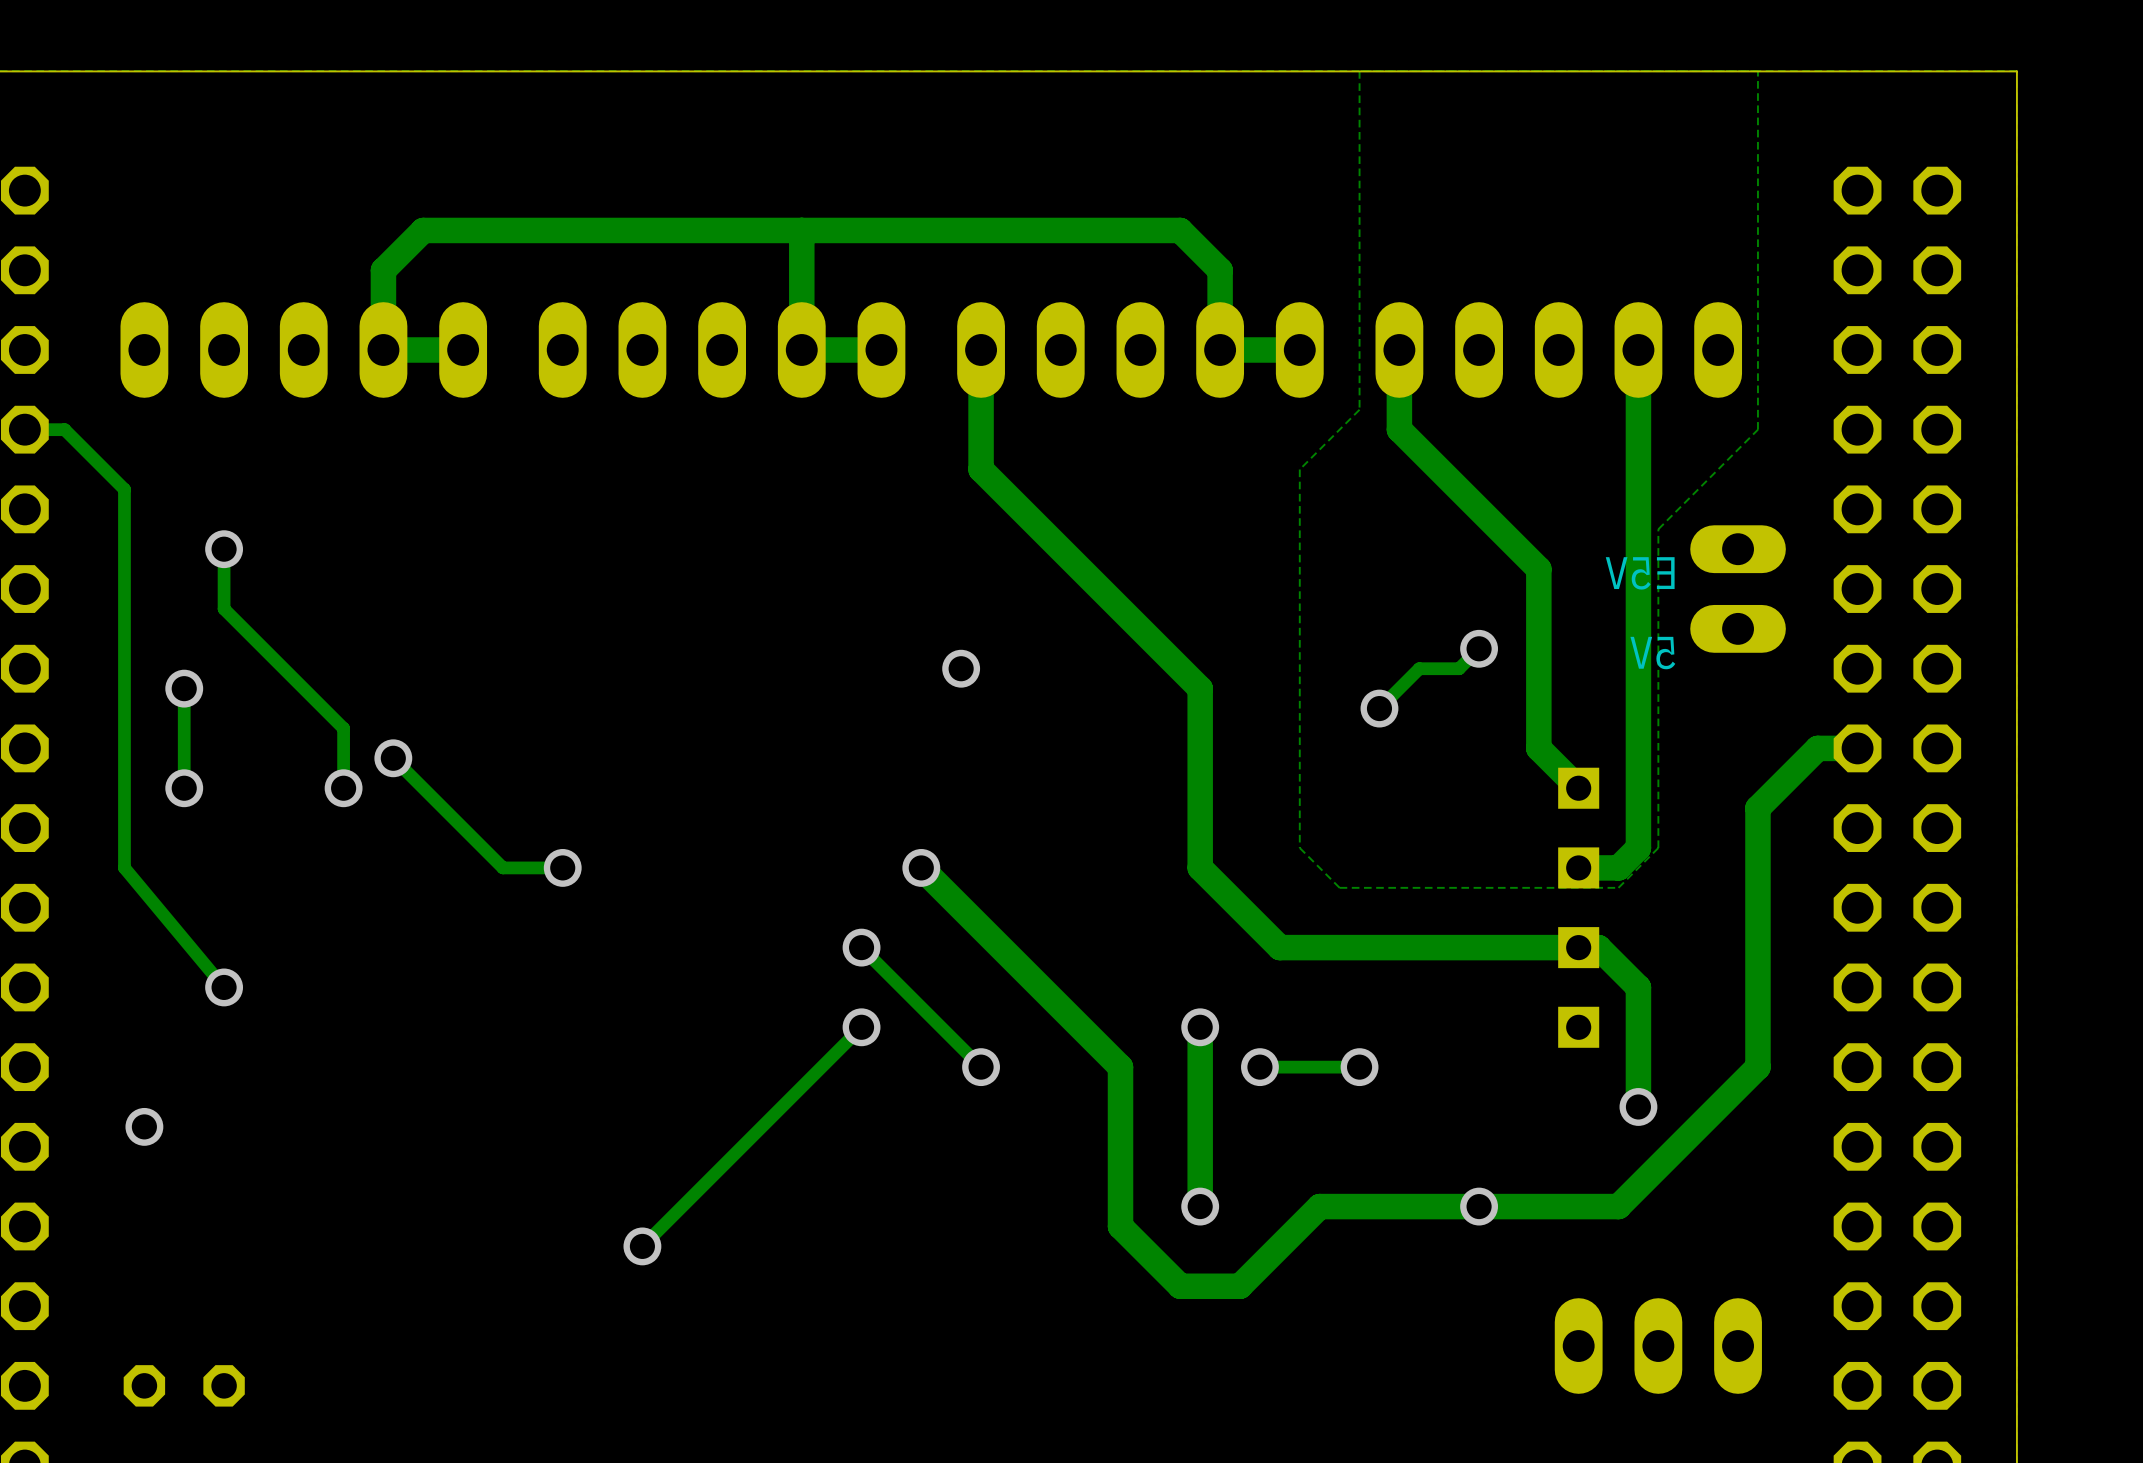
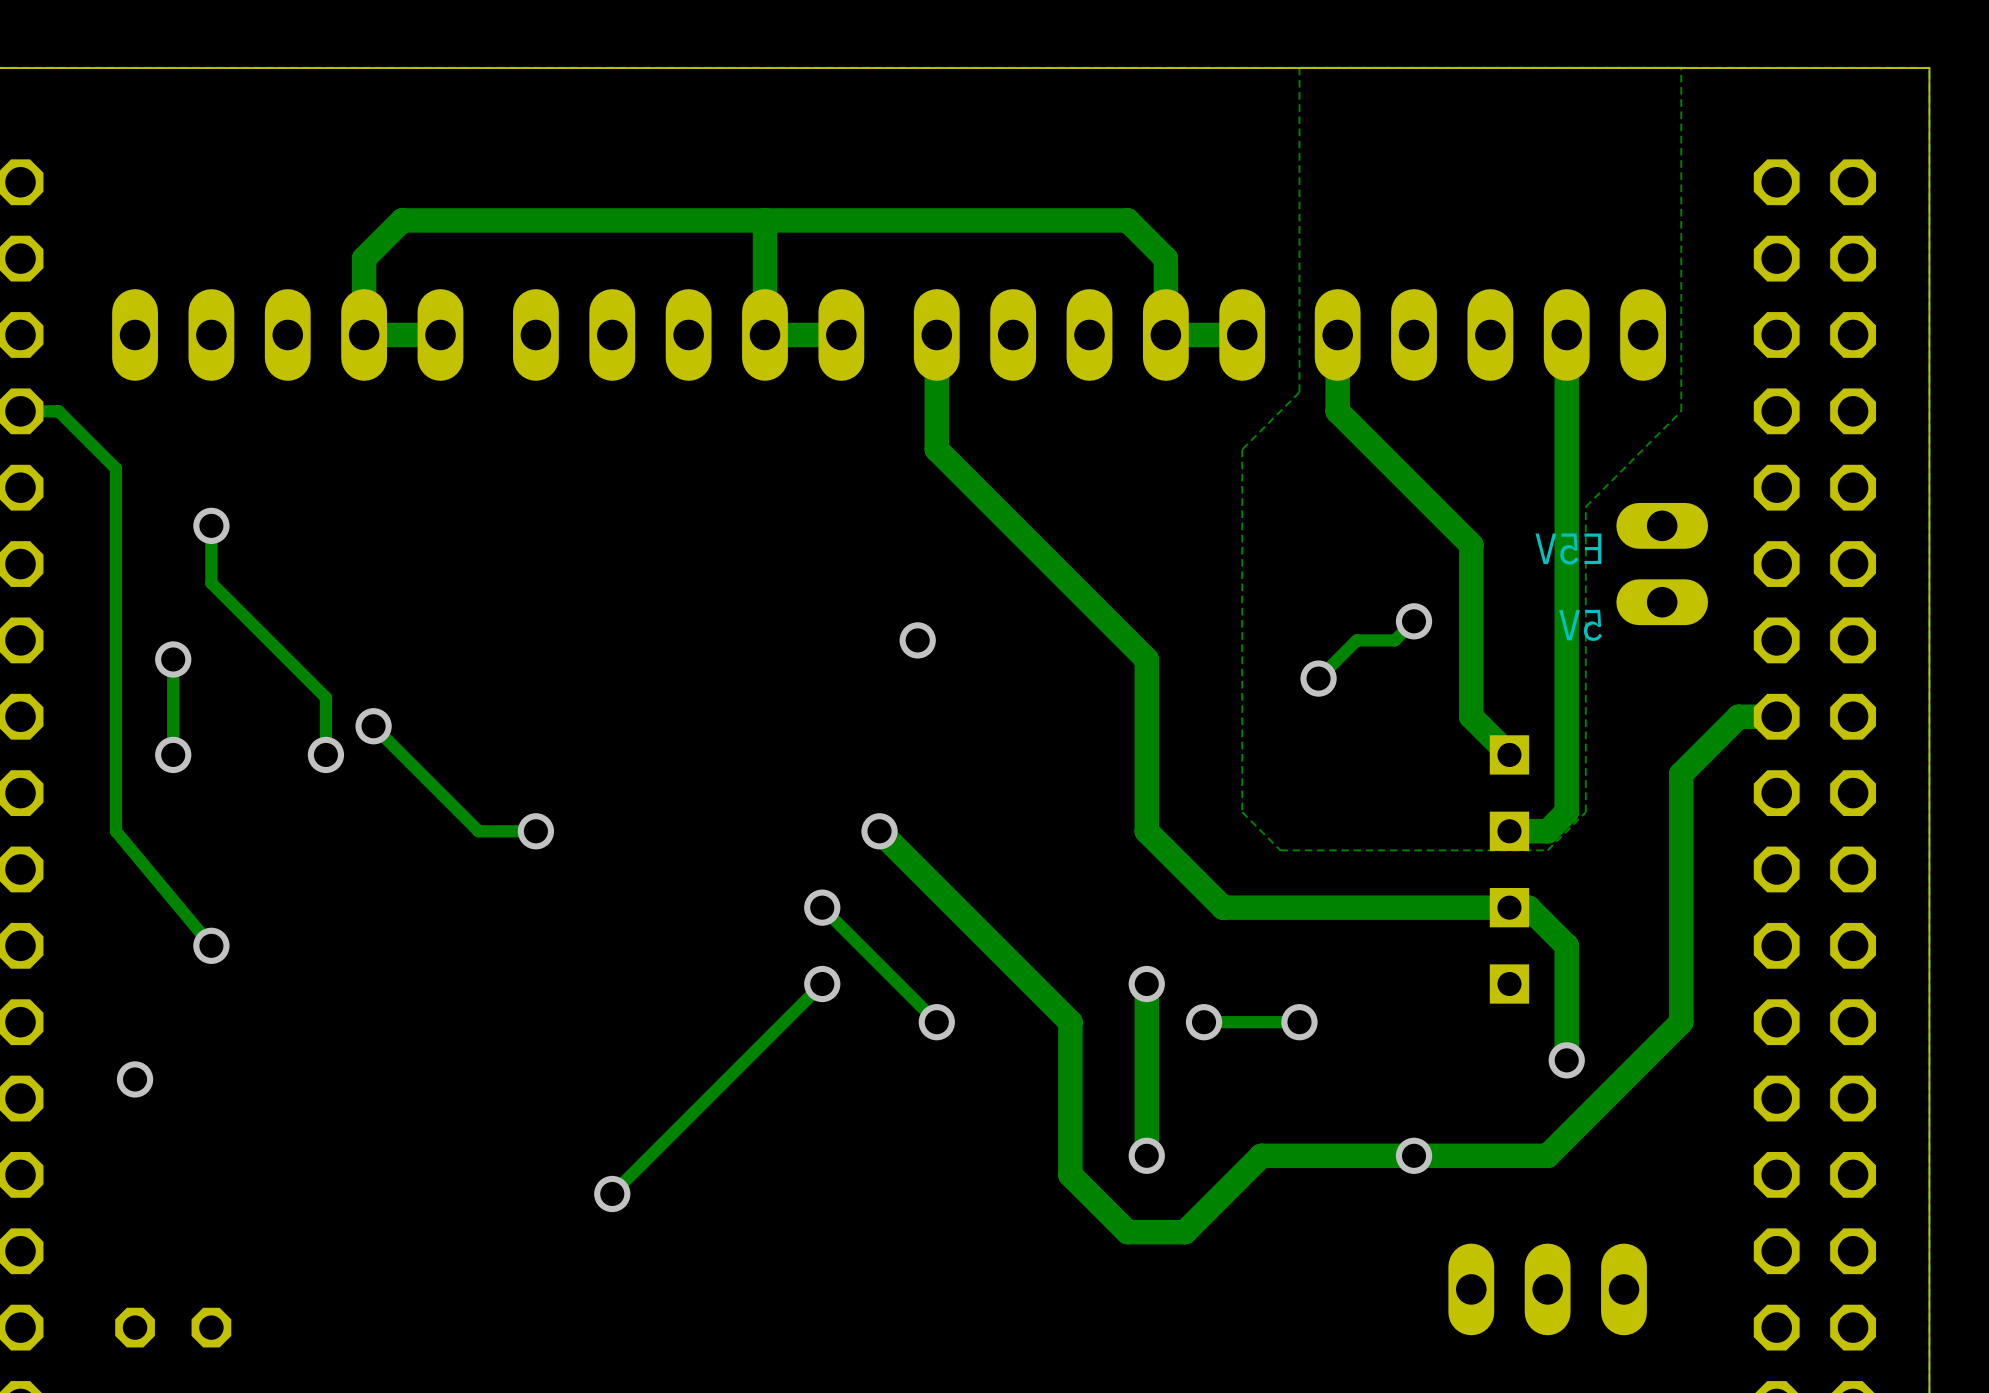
part position: (1658, 1346) -> (1547, 1289)

